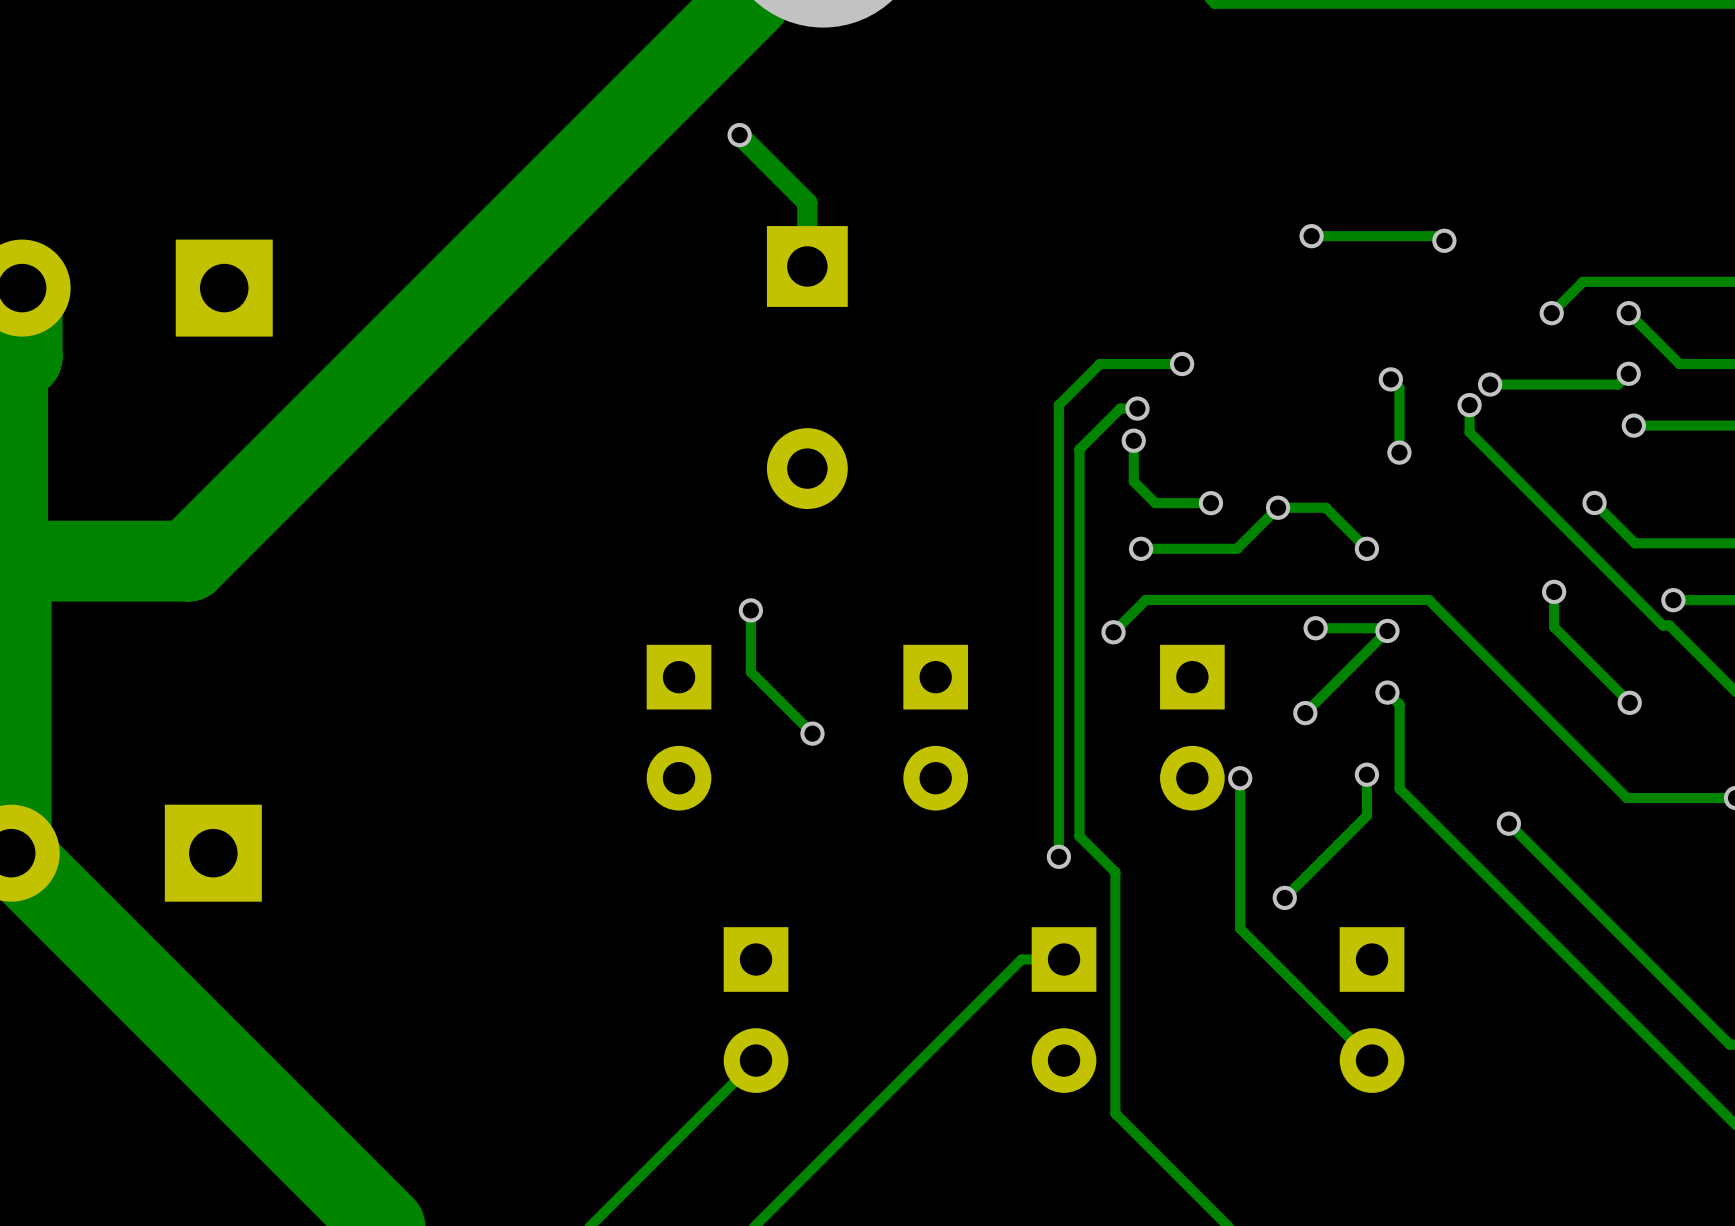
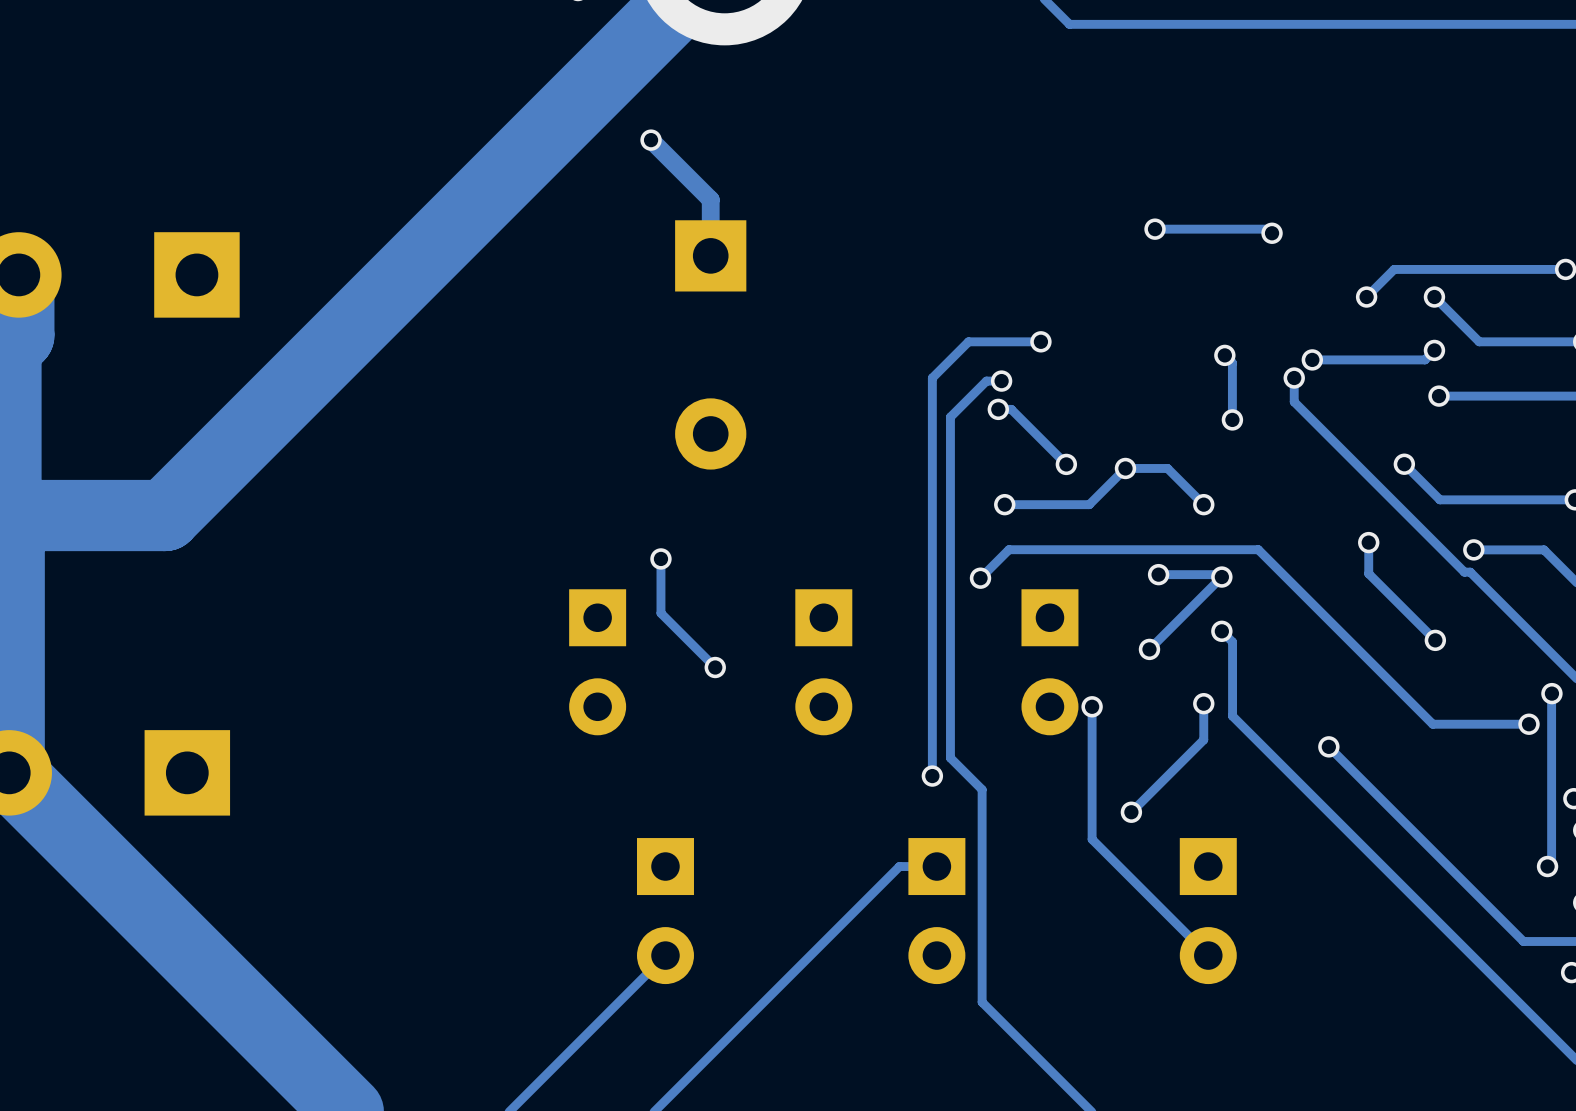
track: (1133, 440) (1133, 481) (1155, 503) (1210, 503) -> (998, 409) (1011, 409) (1066, 464)

